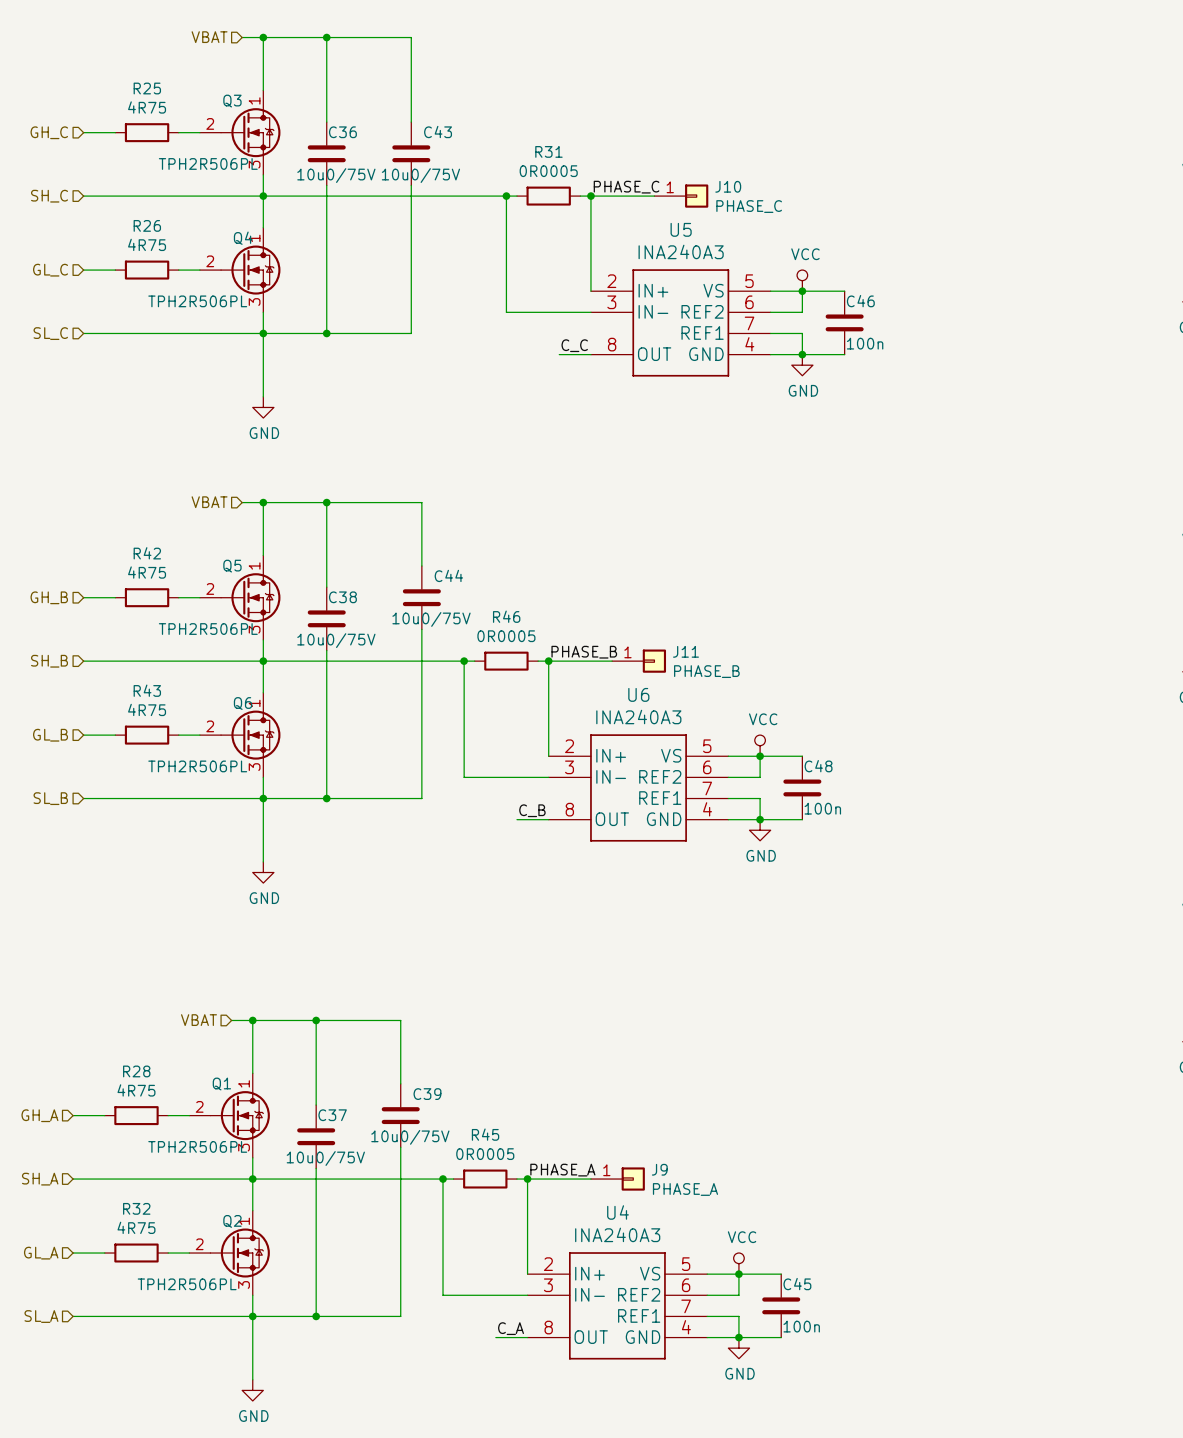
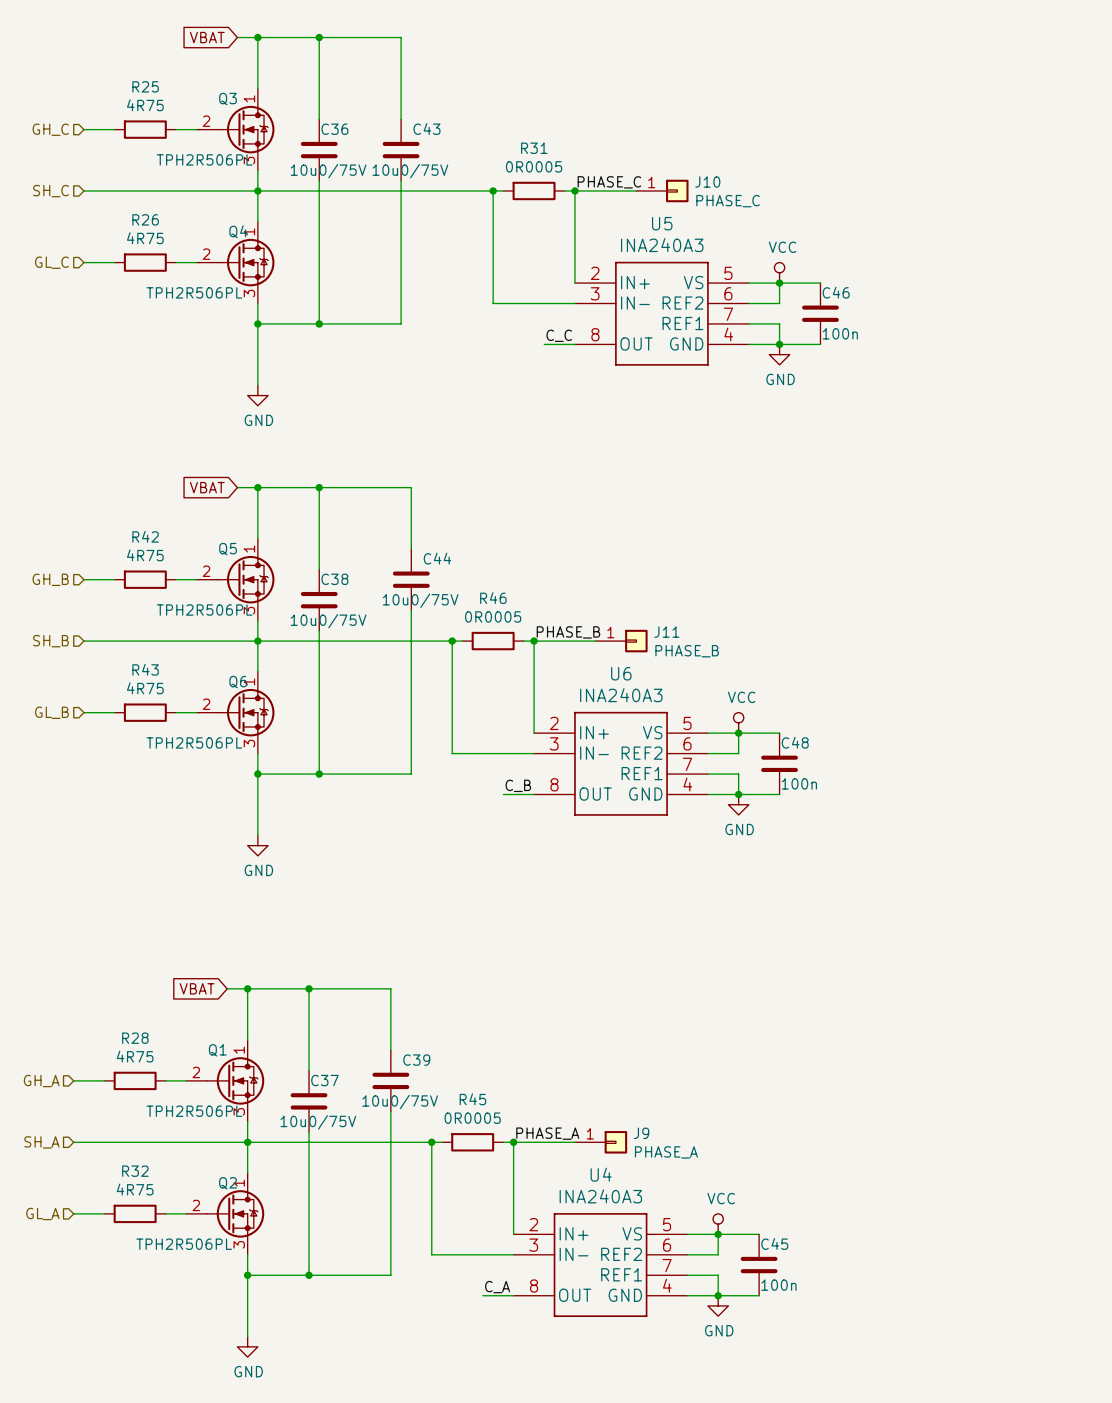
hierarchical label: VBAT (209, 37) -> none
global label: none -> VBAT (207, 37)
hierarchical label: SL_C (50, 333) -> none
wire: (83, 333) (263, 333) -> none
hierarchical label: VBAT (209, 502) -> none
global label: none -> VBAT (207, 487)
hierarchical label: SL_B (50, 798) -> none
wire: (83, 798) (263, 798) -> none
hierarchical label: VBAT (198, 1020) -> none
global label: none -> VBAT (197, 988)
hierarchical label: SL_A (41, 1316) -> none
wire: (73, 1316) (252, 1316) -> none

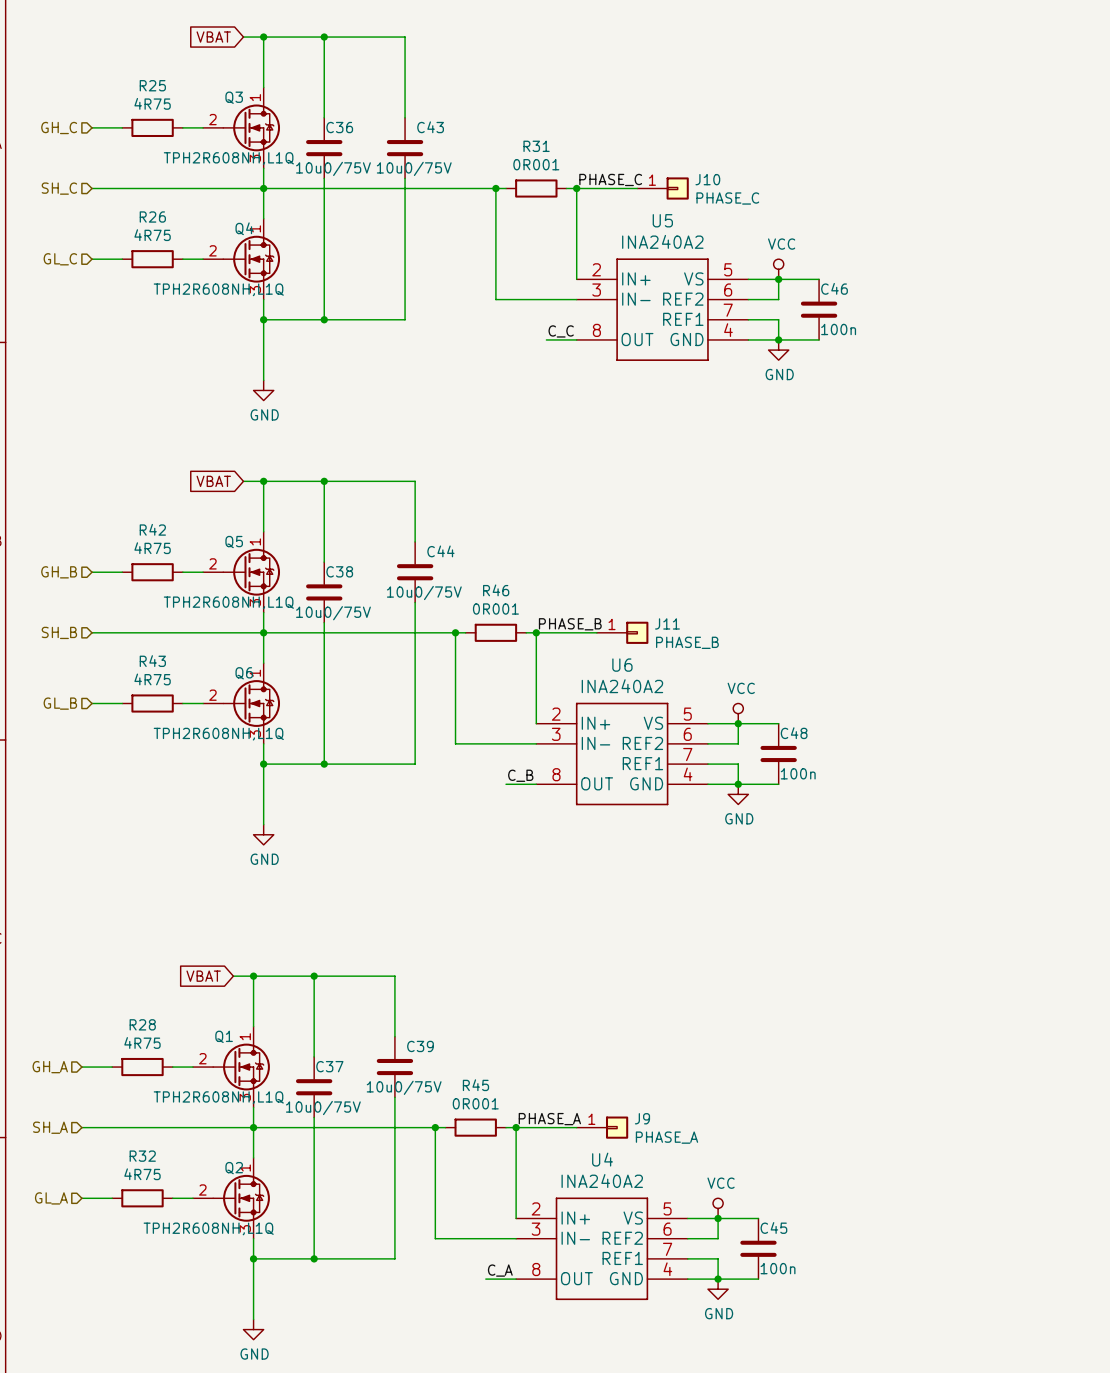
Q3 value: TPH2R506PL (204, 159) -> TPH2R608NH,L1Q (228, 158)
R31 value: 0R0005 (534, 166) -> 0R001 (536, 164)
U5 value: INA240A3 (662, 245) -> INA240A2 (662, 241)
Q4 value: TPH2R506PL (194, 292) -> TPH2R608NH,L1Q (218, 289)
Q5 value: TPH2R506PL (204, 610) -> TPH2R608NH,L1Q (228, 602)
R46 value: 0R0005 (493, 616) -> 0R001 (495, 609)
U6 value: INA240A3 (621, 695) -> INA240A2 (622, 686)
Q6 value: TPH2R506PL (194, 742) -> TPH2R608NH,L1Q (218, 734)
Q1 value: TPH2R506PL (194, 1111) -> TPH2R608NH,L1Q (218, 1097)
R45 value: 0R0005 (472, 1118) -> 0R001 (475, 1103)
U4 value: INA240A3 (600, 1196) -> INA240A2 (602, 1181)
Q2 value: TPH2R506PL (184, 1244) -> TPH2R608NH,L1Q (208, 1228)

